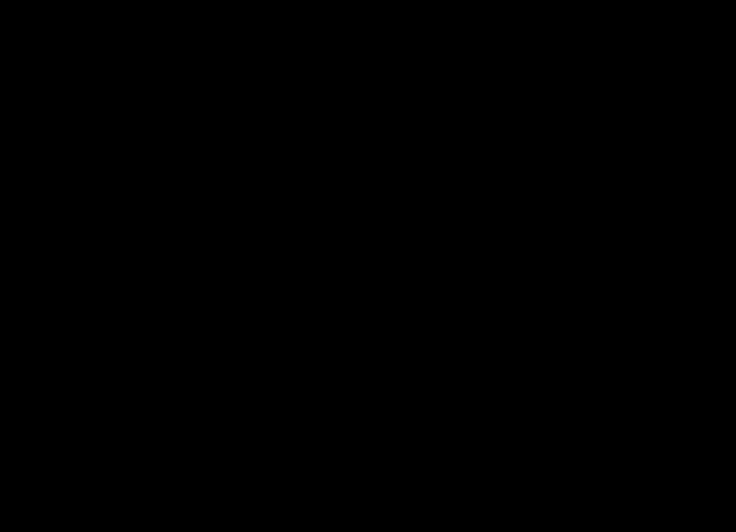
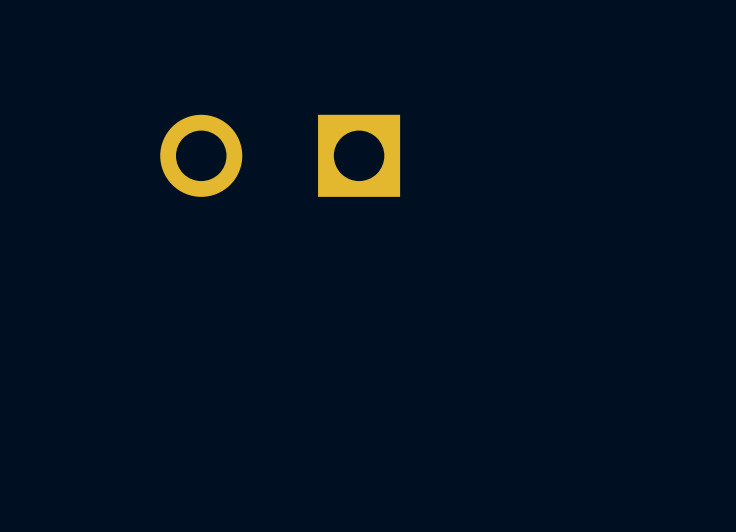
part: none -> (280, 155)

